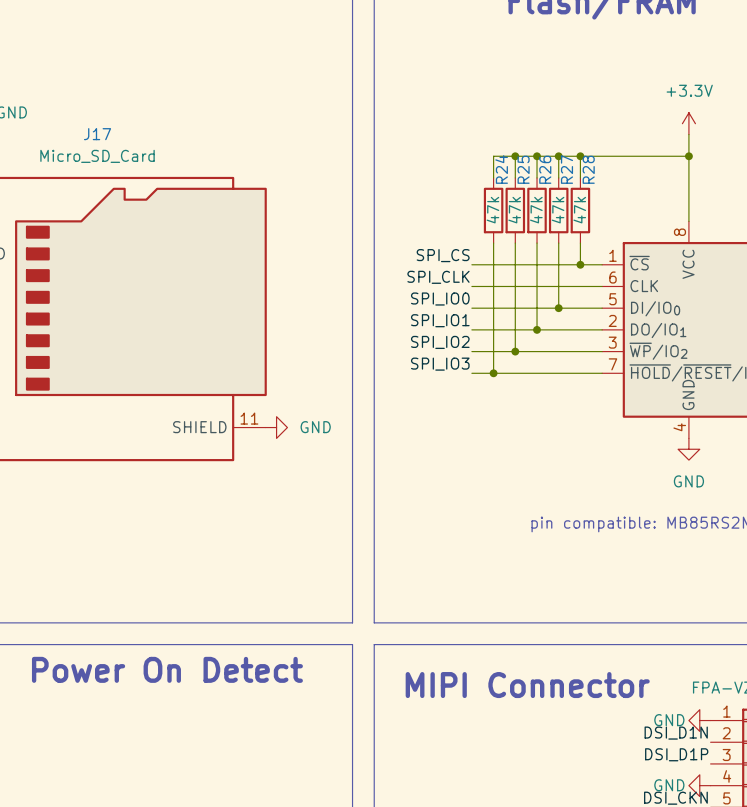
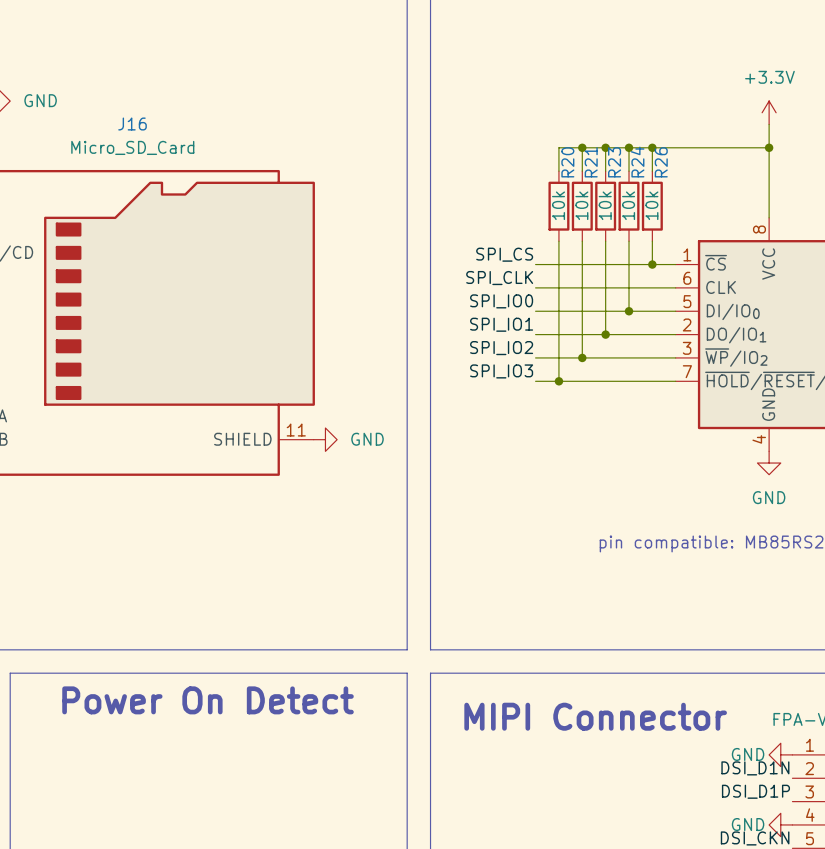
J17 name: J17 (97, 134) -> J16 (132, 124)
R24 name: R24 (501, 169) -> R20 (567, 162)
R25 name: R25 (523, 169) -> R21 (591, 162)
R26 name: R26 (545, 169) -> R23 (614, 162)
R27 name: R27 (566, 169) -> R24 (637, 162)
R28 name: R28 (588, 169) -> R26 (661, 162)
R24 value: 47k (492, 210) -> 10k (558, 205)
R25 value: 47k (514, 210) -> 10k (581, 205)
R26 value: 47k (536, 210) -> 10k (605, 205)
R27 value: 47k (558, 210) -> 10k (628, 205)
R28 value: 47k (579, 210) -> 10k (651, 205)

